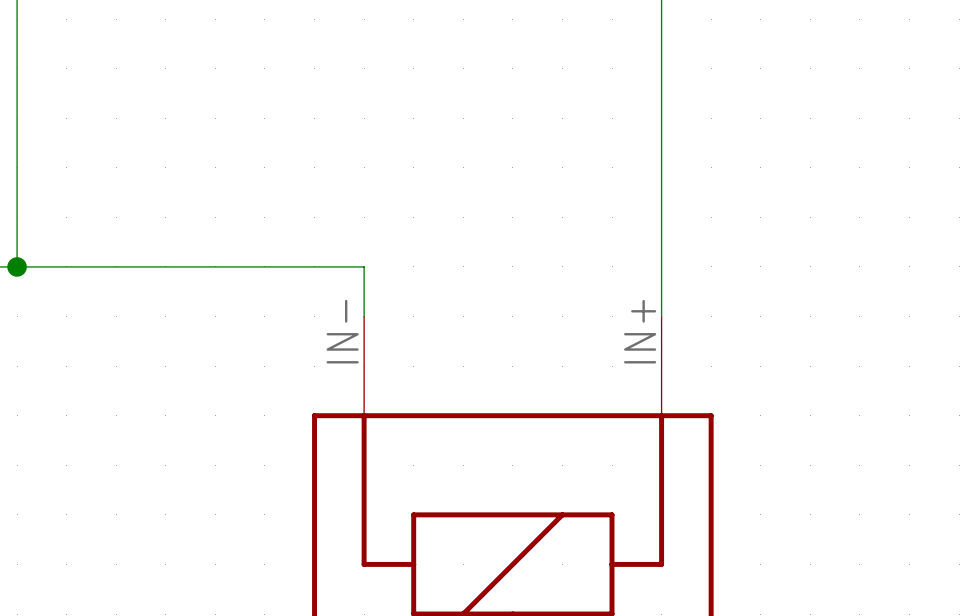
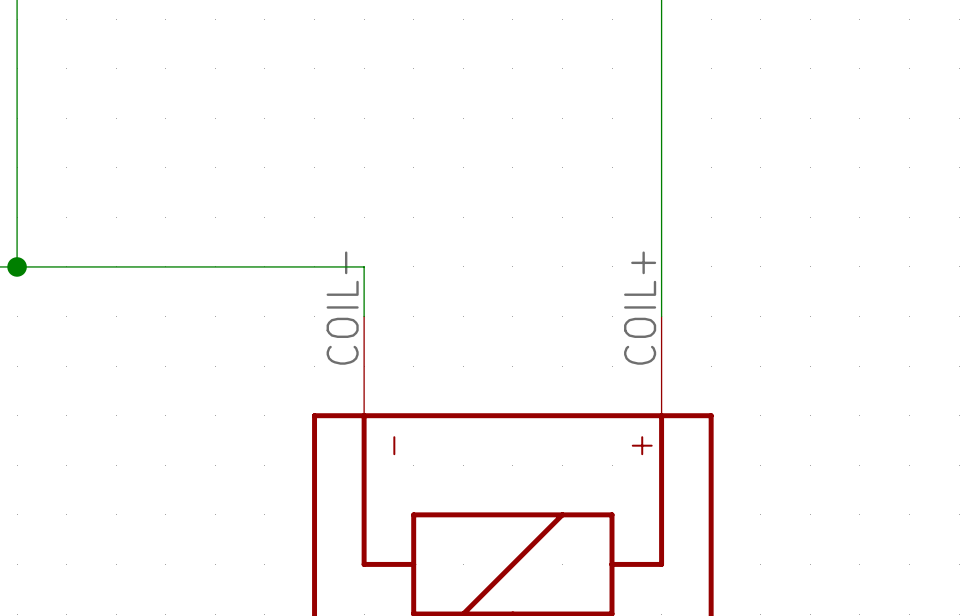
part pin number: IN- (342, 331) -> COIL- (342, 308)
part pin number: IN+ (640, 331) -> COIL+ (640, 308)
part text: none -> - (394, 445)
part text: none -> + (642, 445)

